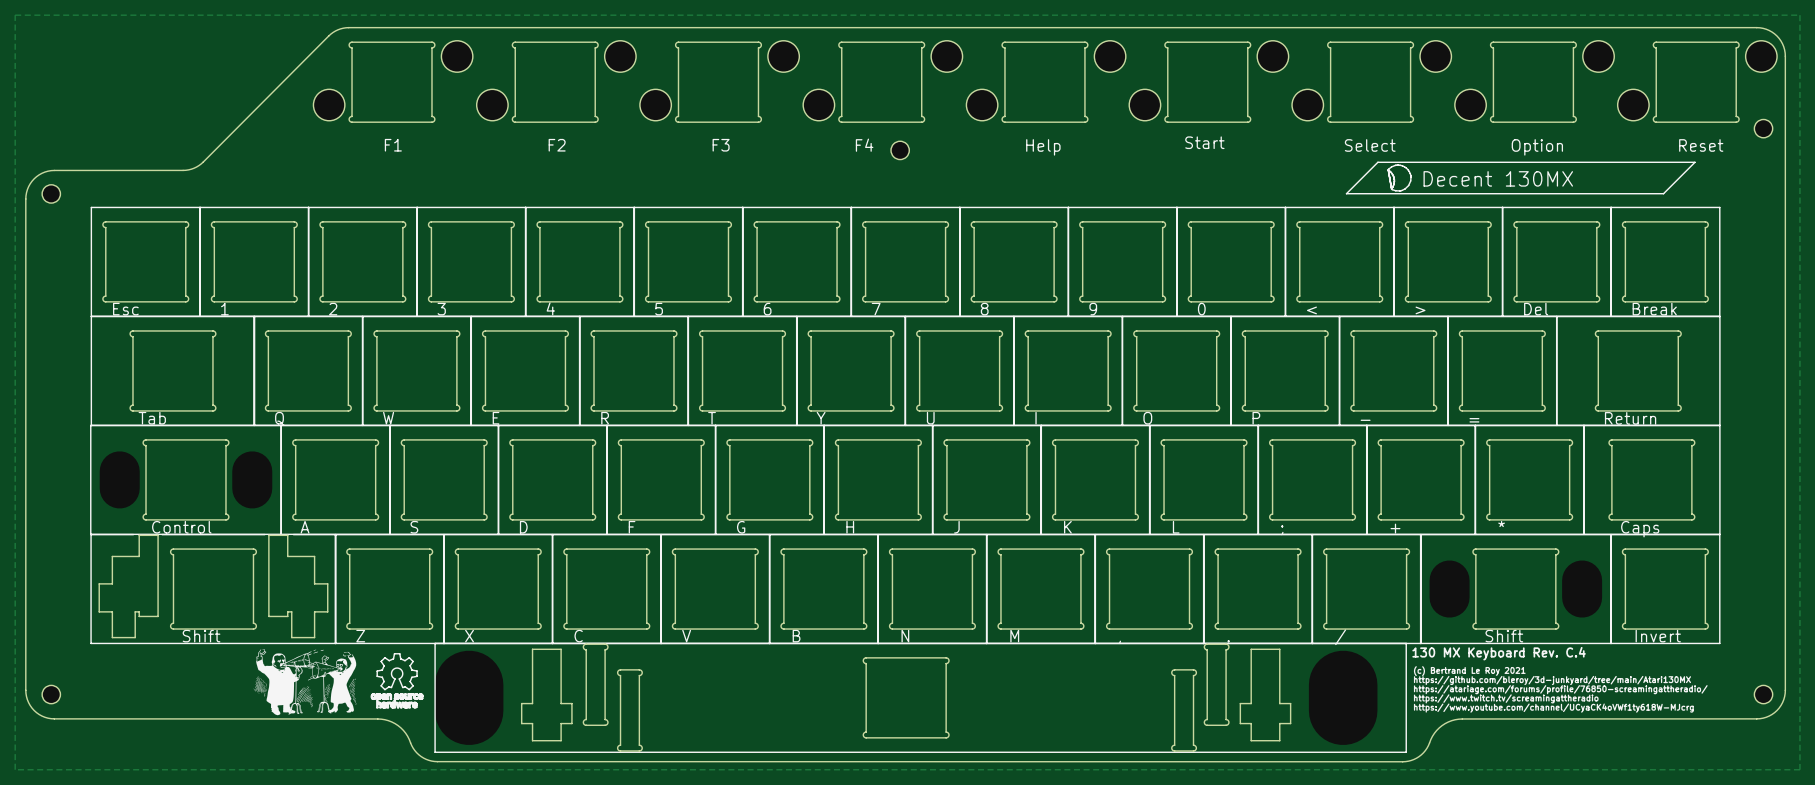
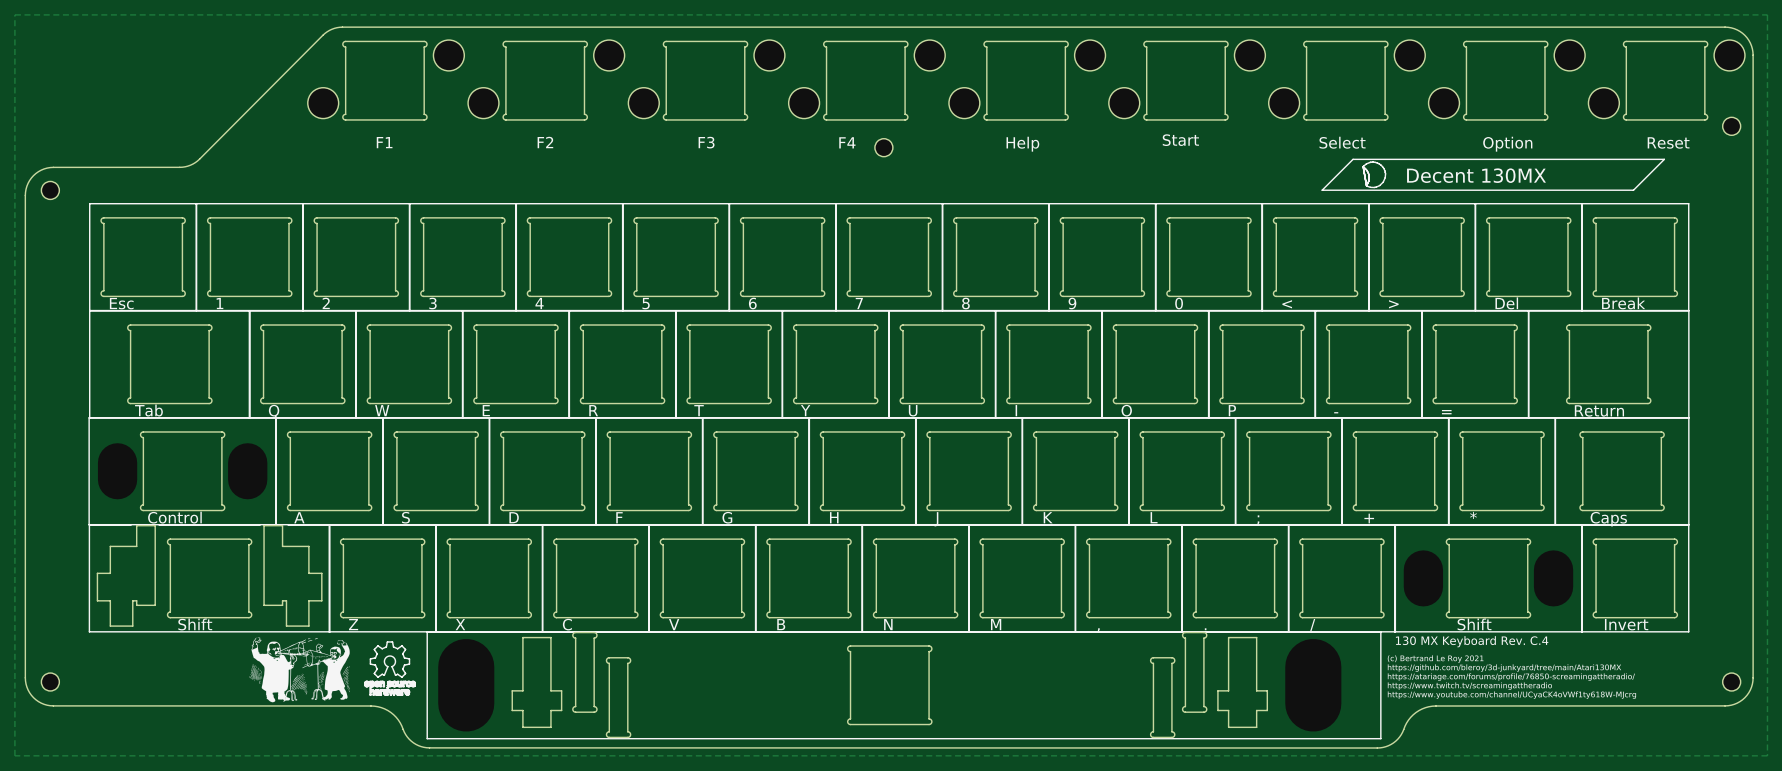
part footprint: [434, 643, 1407, 753] -> [426, 631, 1382, 740]

